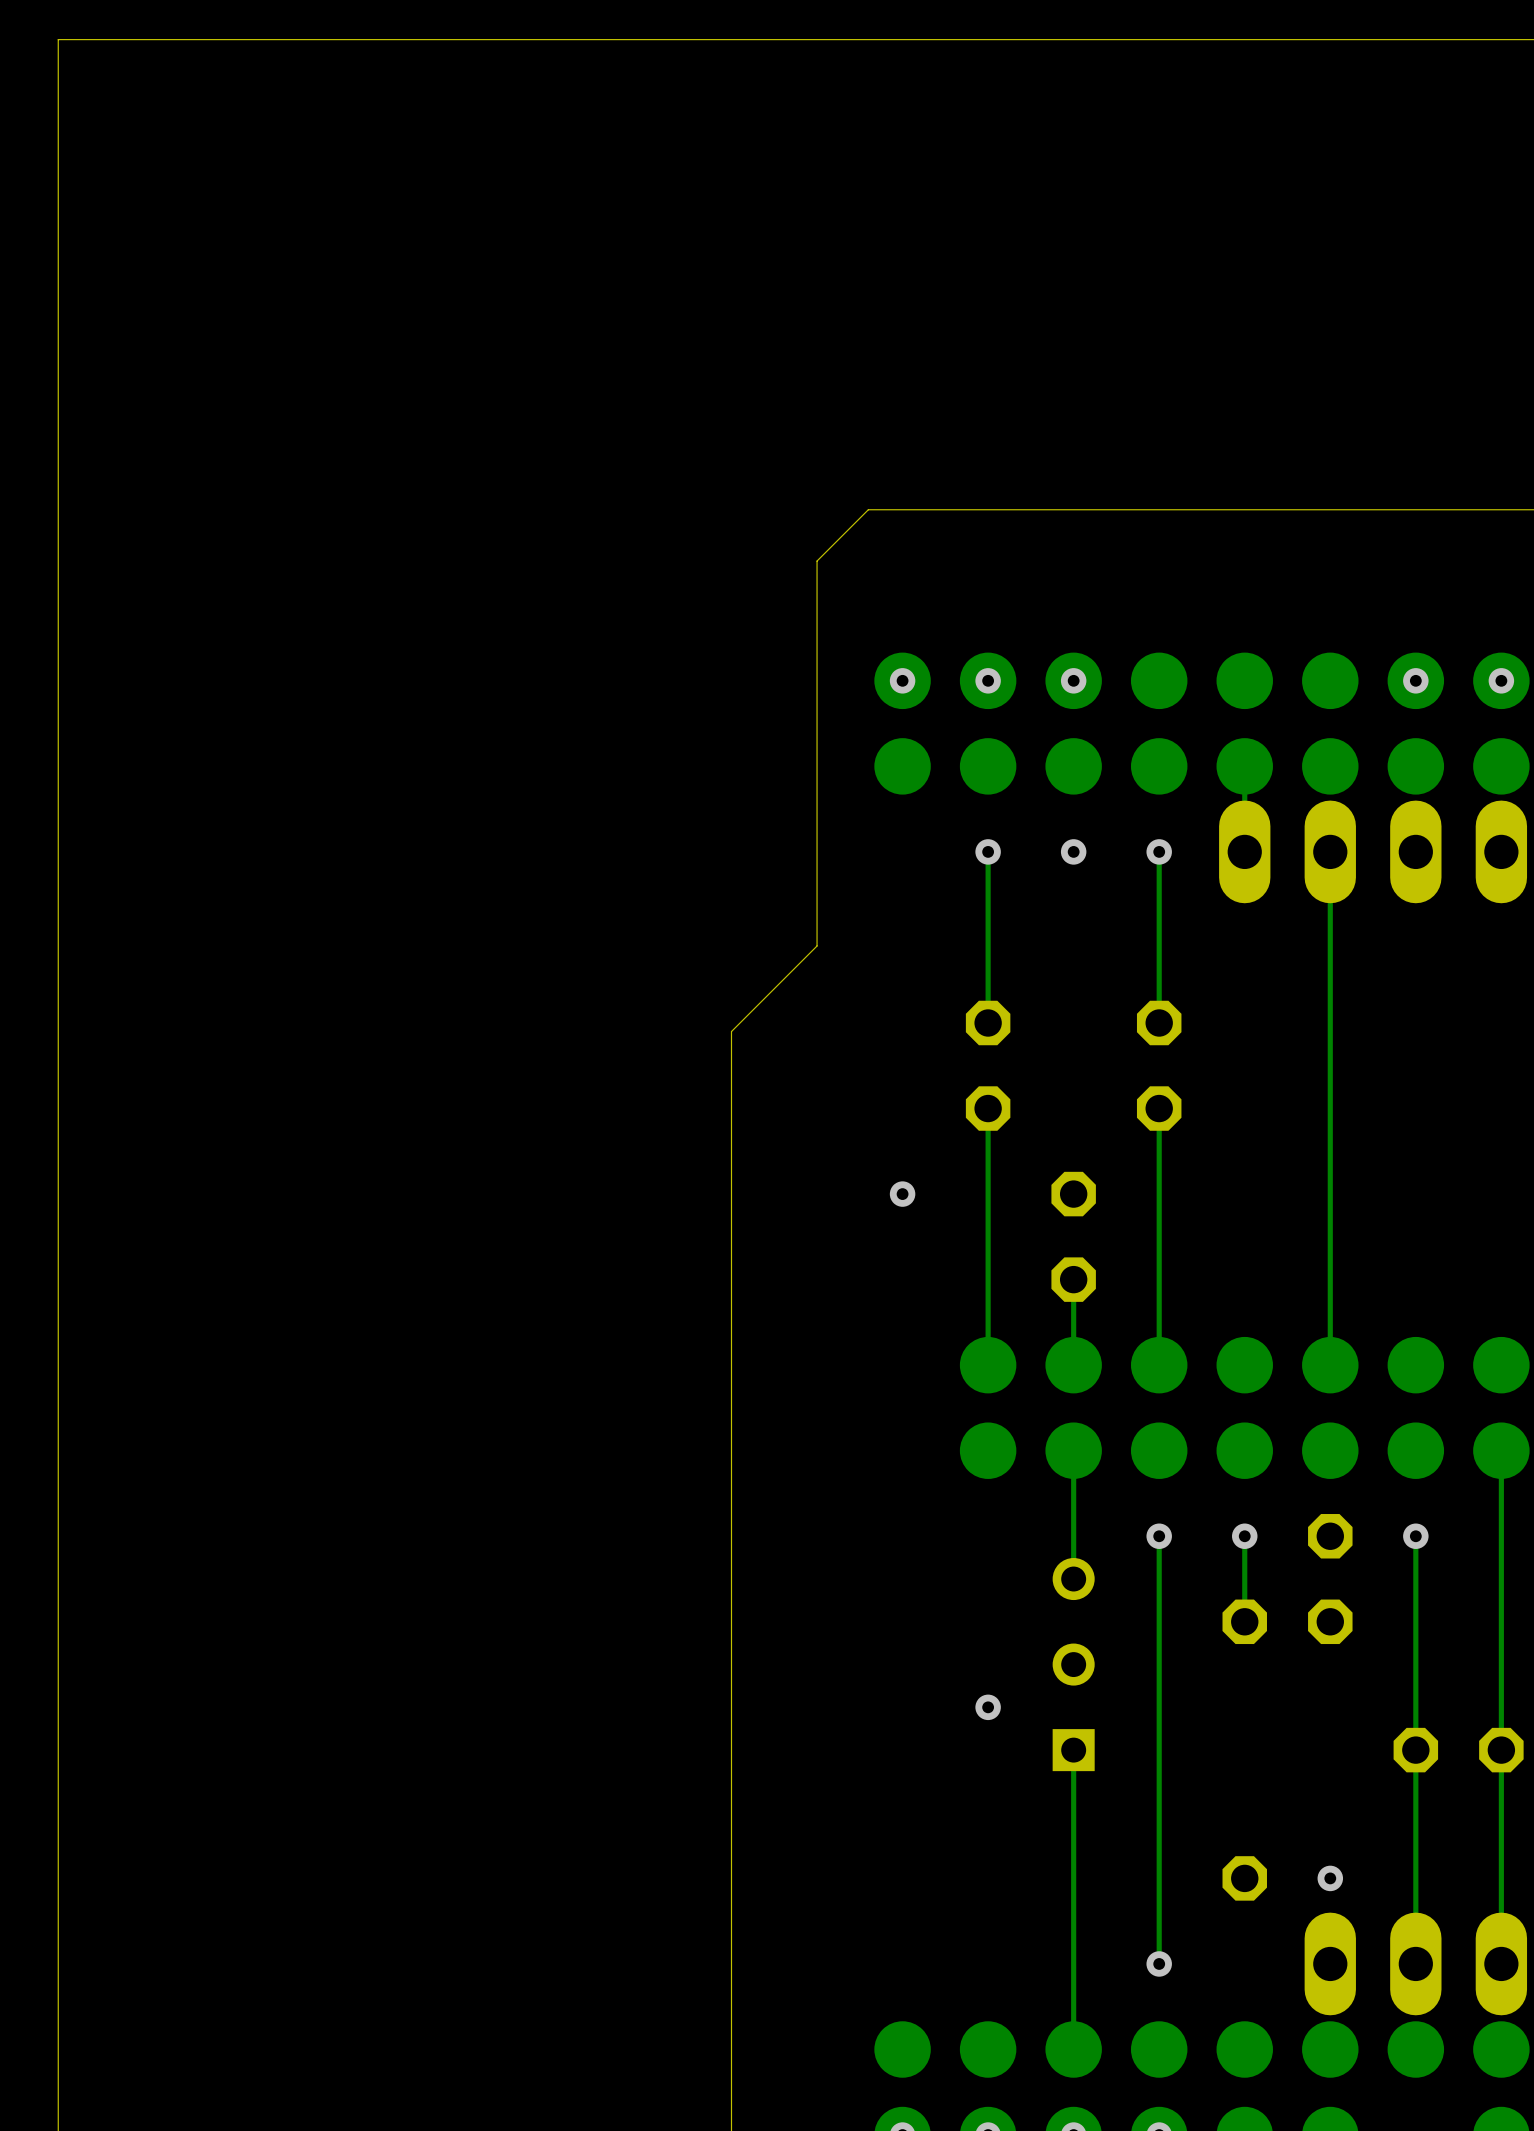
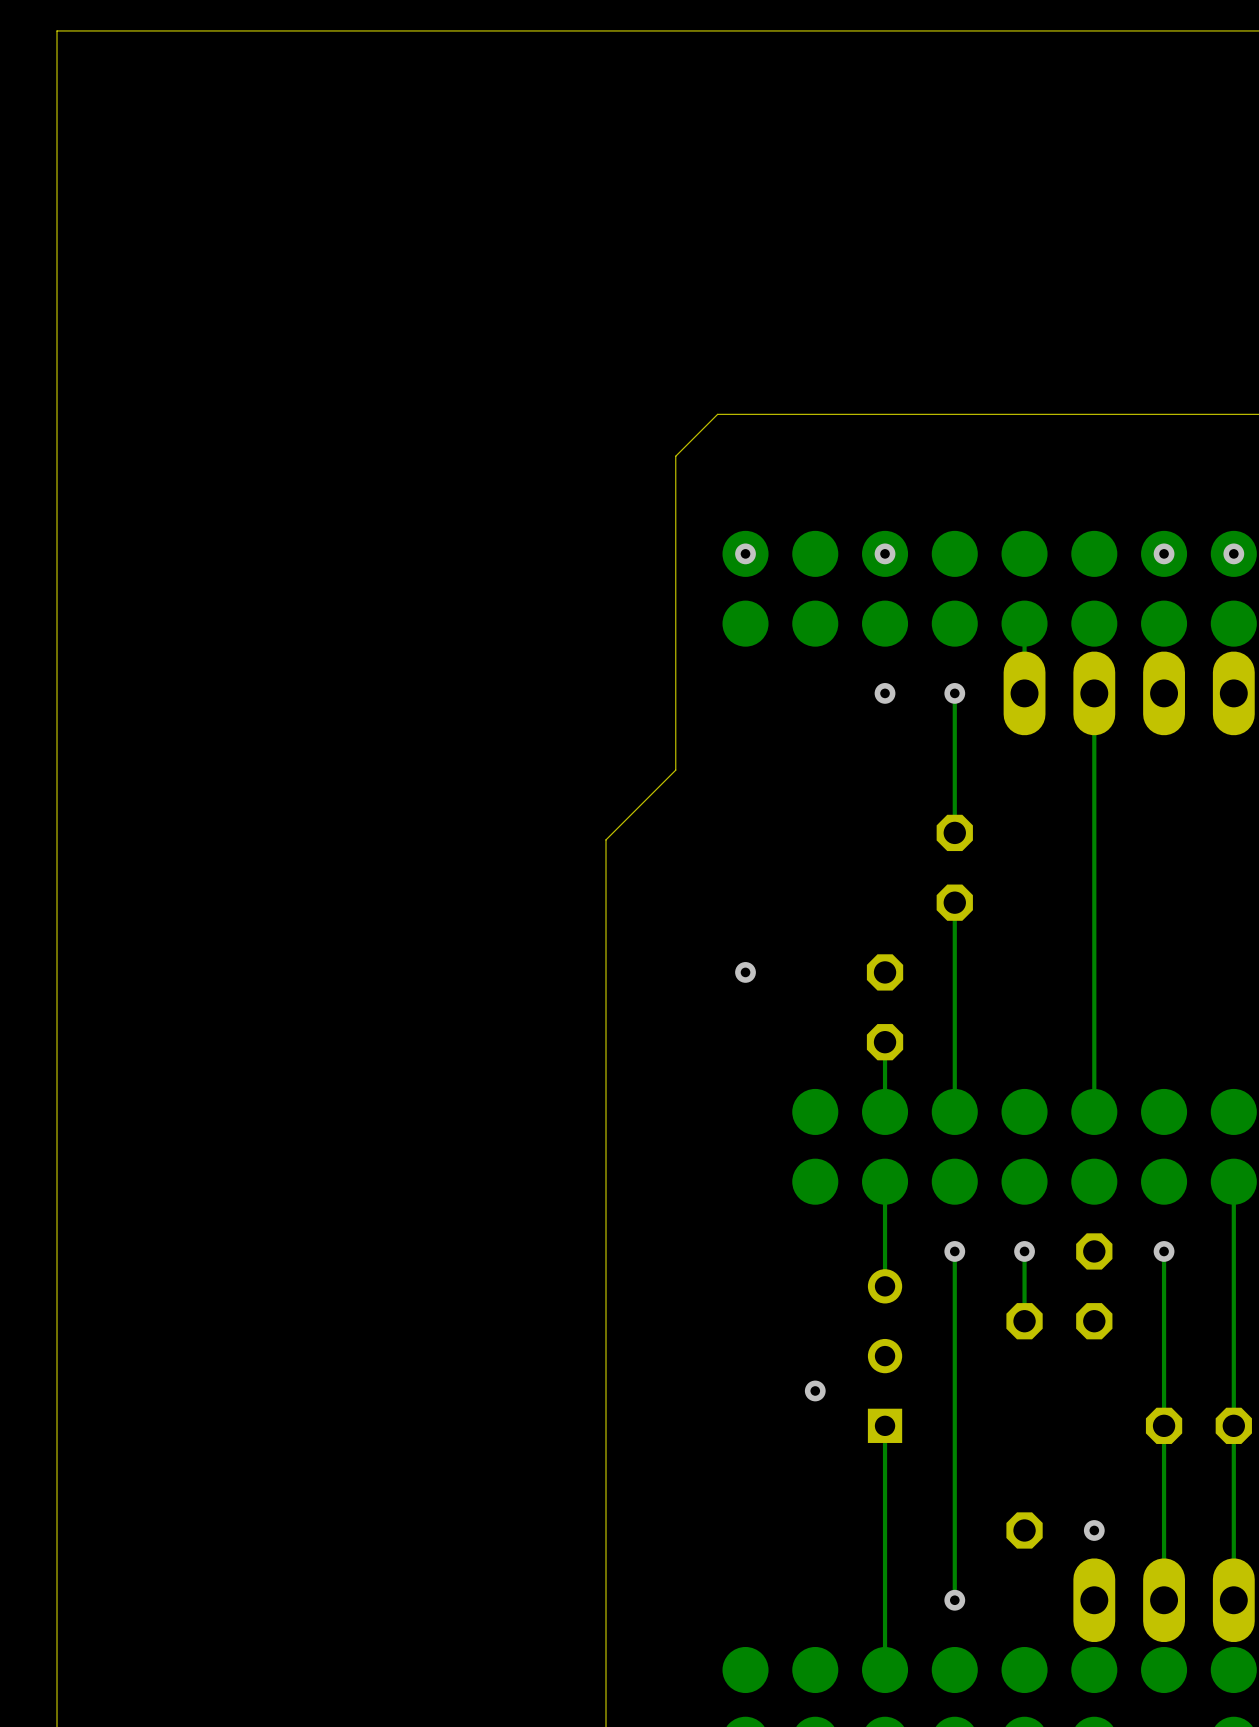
via: (988, 680) -> none
track: (988, 851) (988, 1022) -> none
via: (988, 851) -> none
part: (988, 1065) -> none
track: (988, 1108) (988, 1365) -> none

